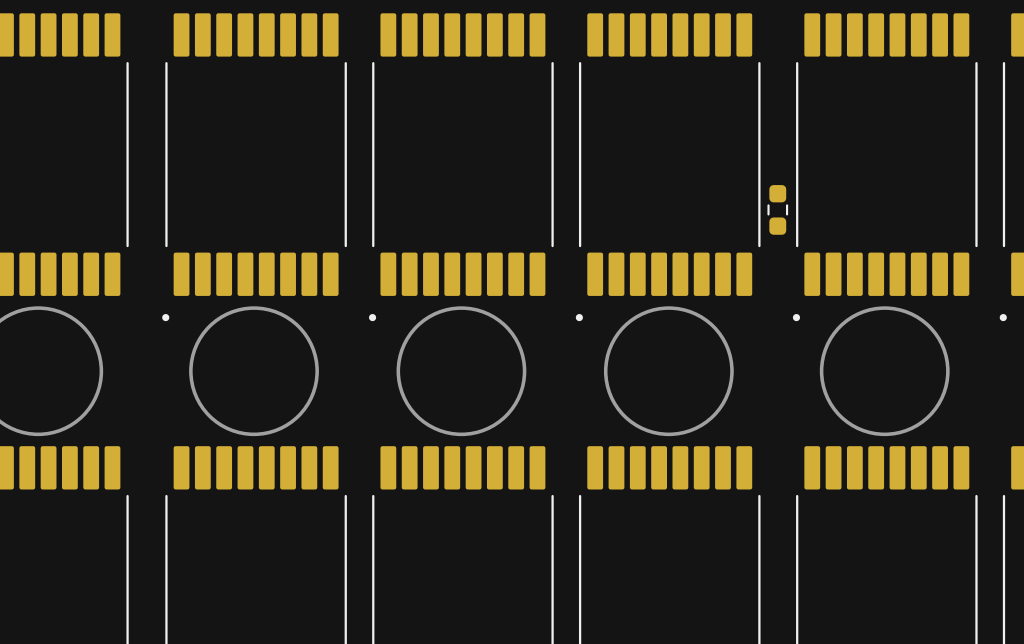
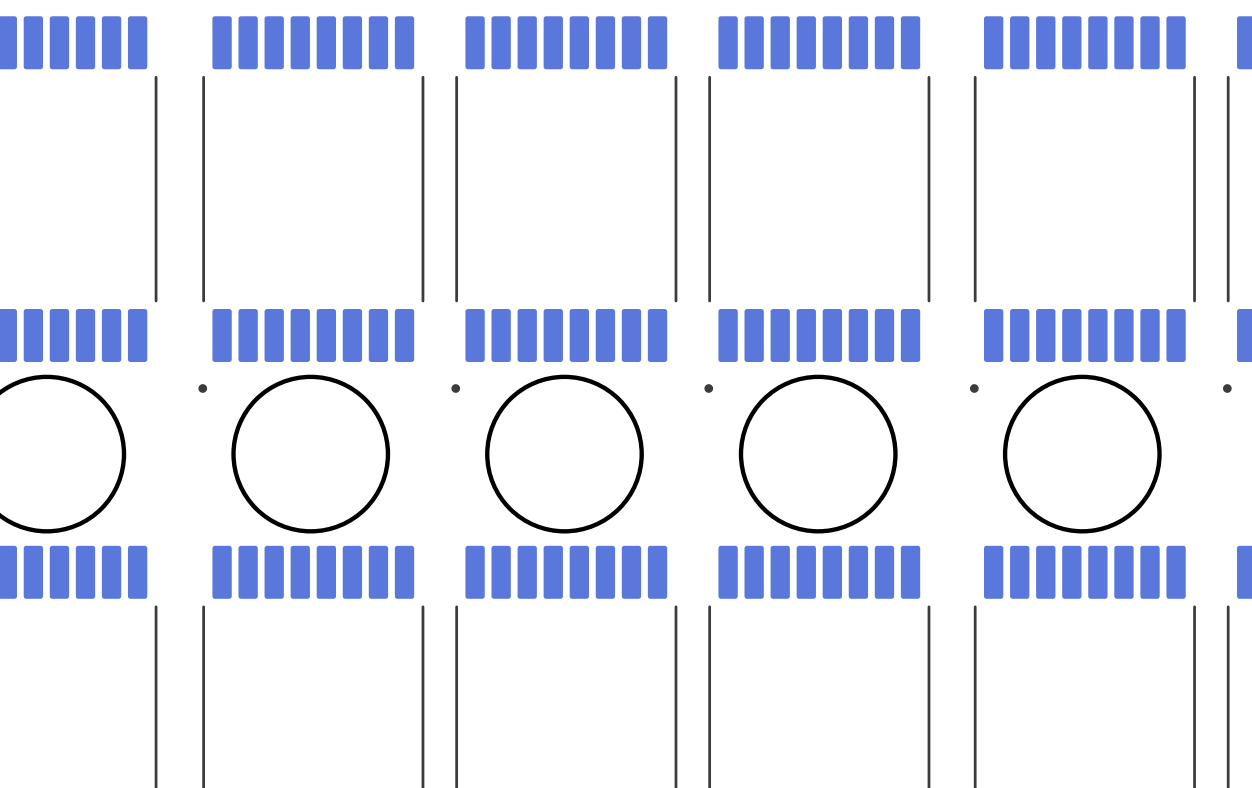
part: (777, 209) -> none

